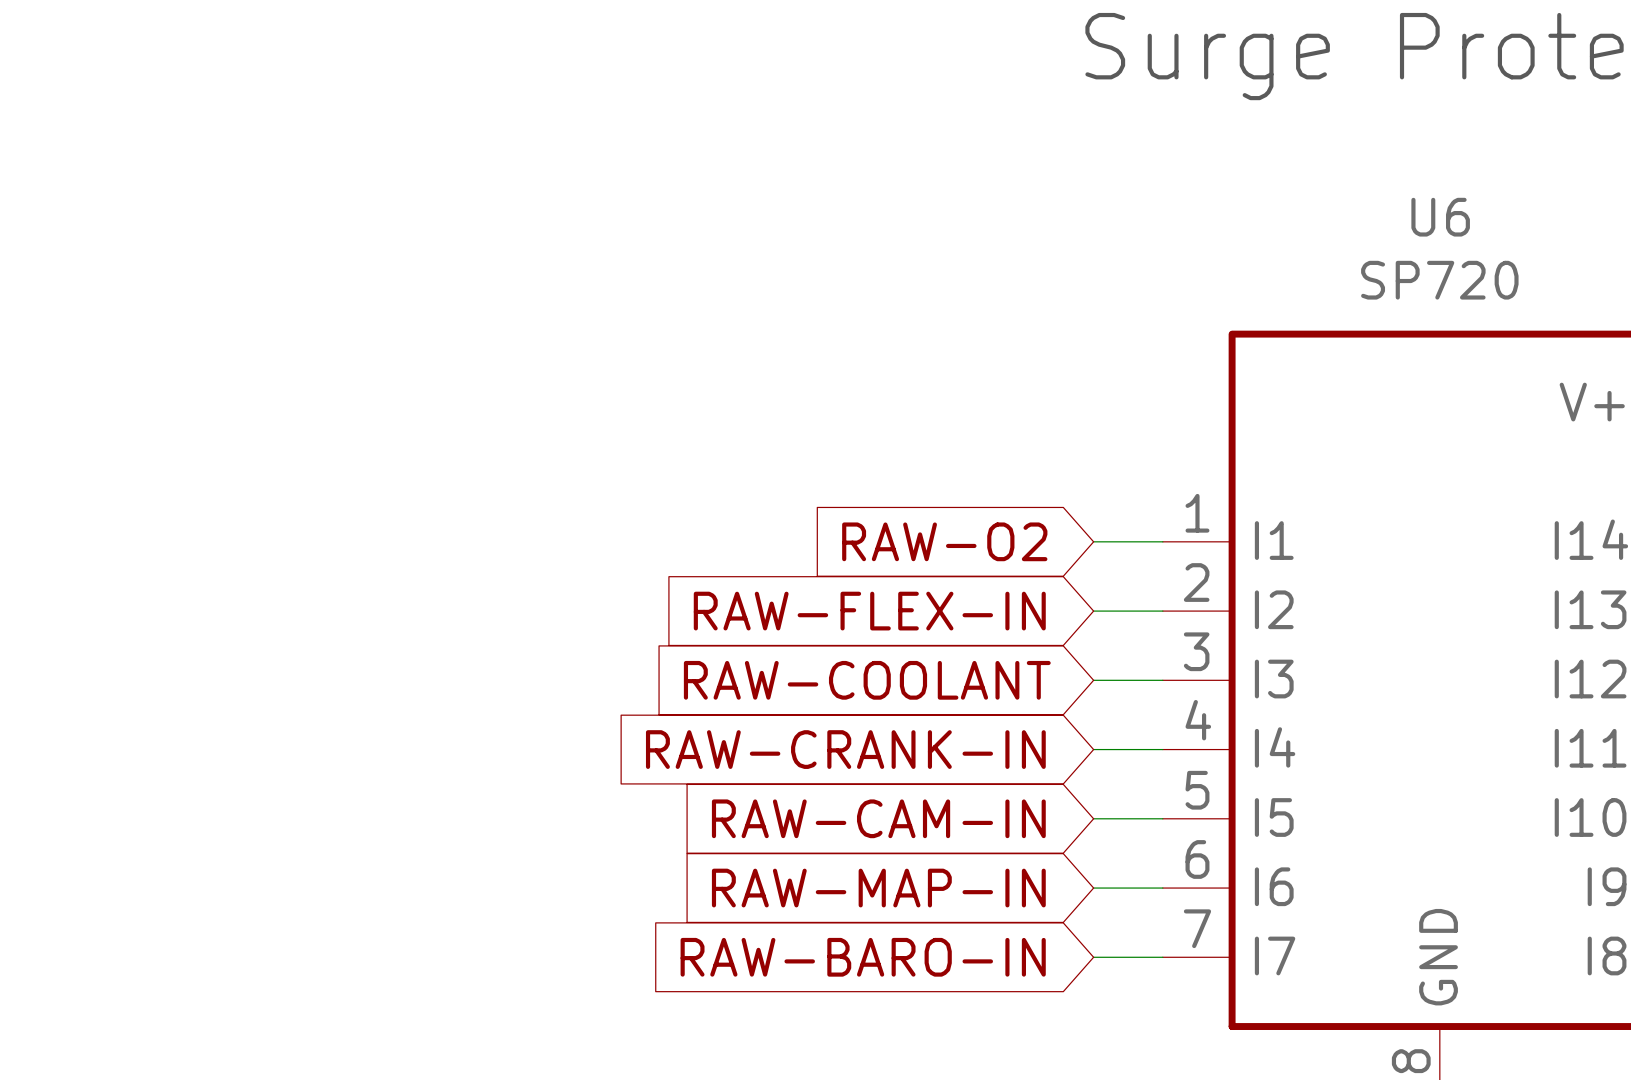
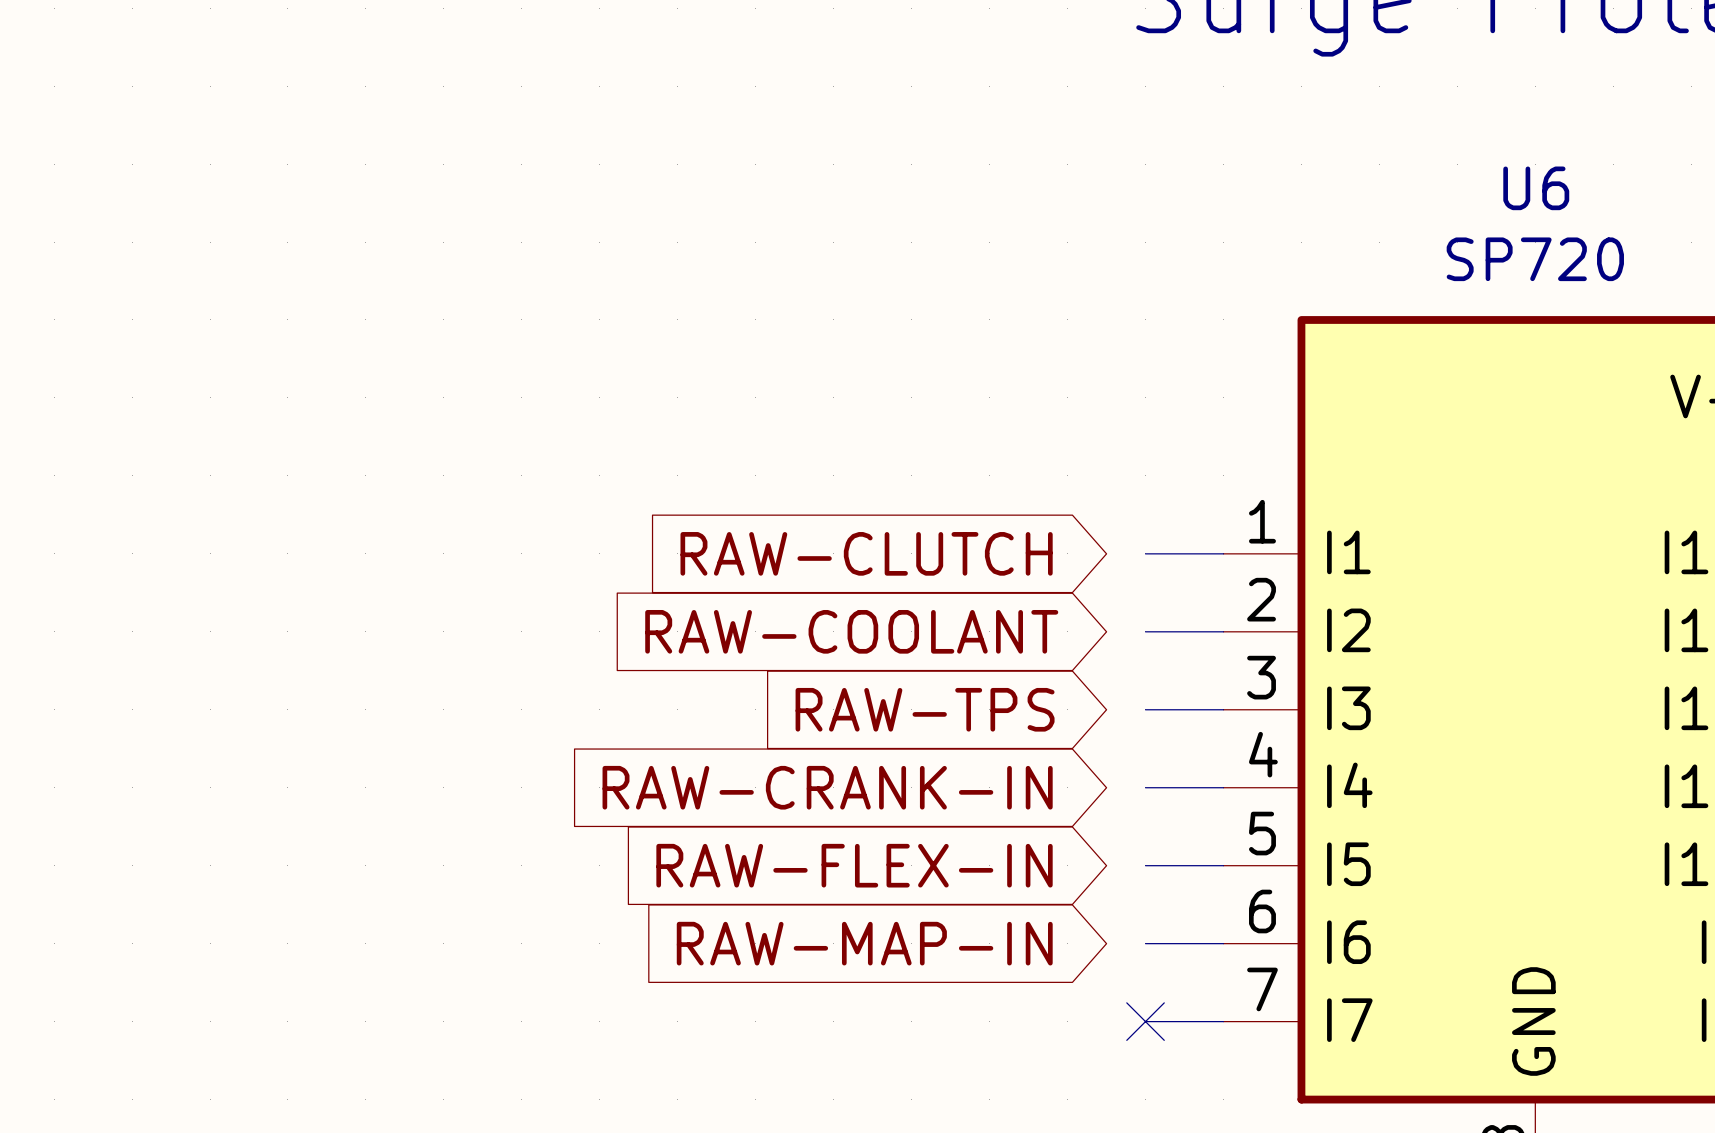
global label: none -> RAW-CLUTCH (866, 553)
global label: RAW-O2 (944, 541) -> none
global label position: RAW-FLEX-IN (869, 611) -> RAW-FLEX-IN (854, 865)
global label position: RAW-COOLANT (867, 680) -> RAW-COOLANT (851, 631)
global label: none -> RAW-TPS (925, 709)
global label position: RAW-CRANK-IN (845, 749) -> RAW-CRANK-IN (827, 787)
global label: RAW-CAM-IN (878, 818) -> none
global label position: RAW-MAP-IN (878, 888) -> RAW-MAP-IN (864, 943)
global label: RAW-BARO-IN (863, 957) -> none
no-connect mark: none -> (1145, 1021)

